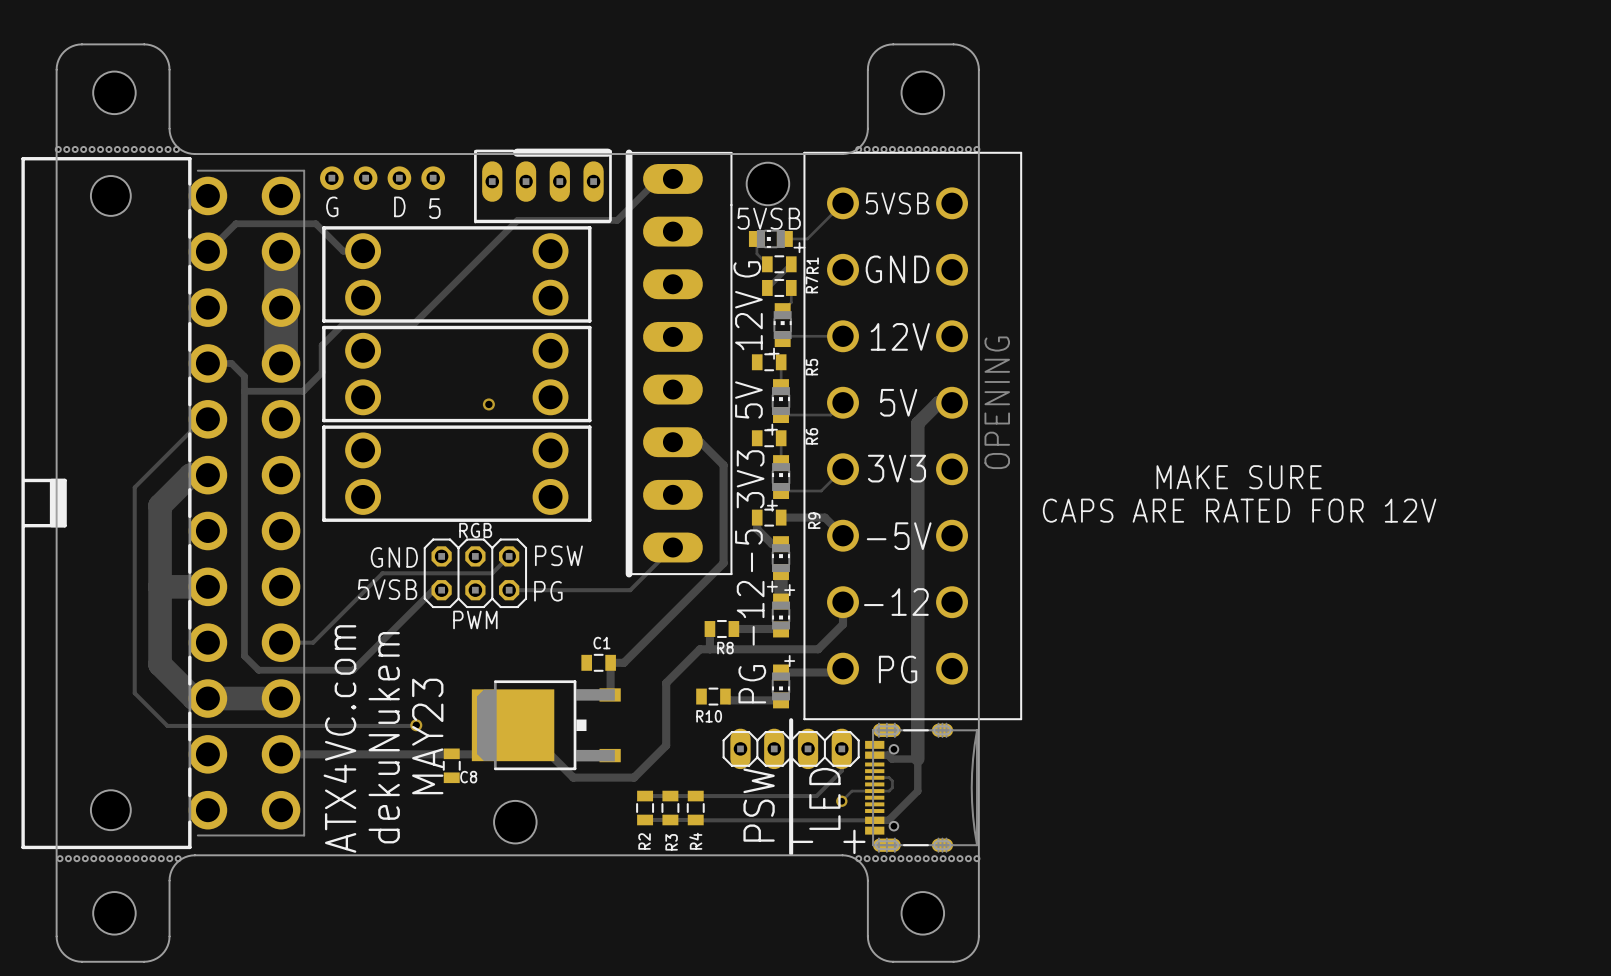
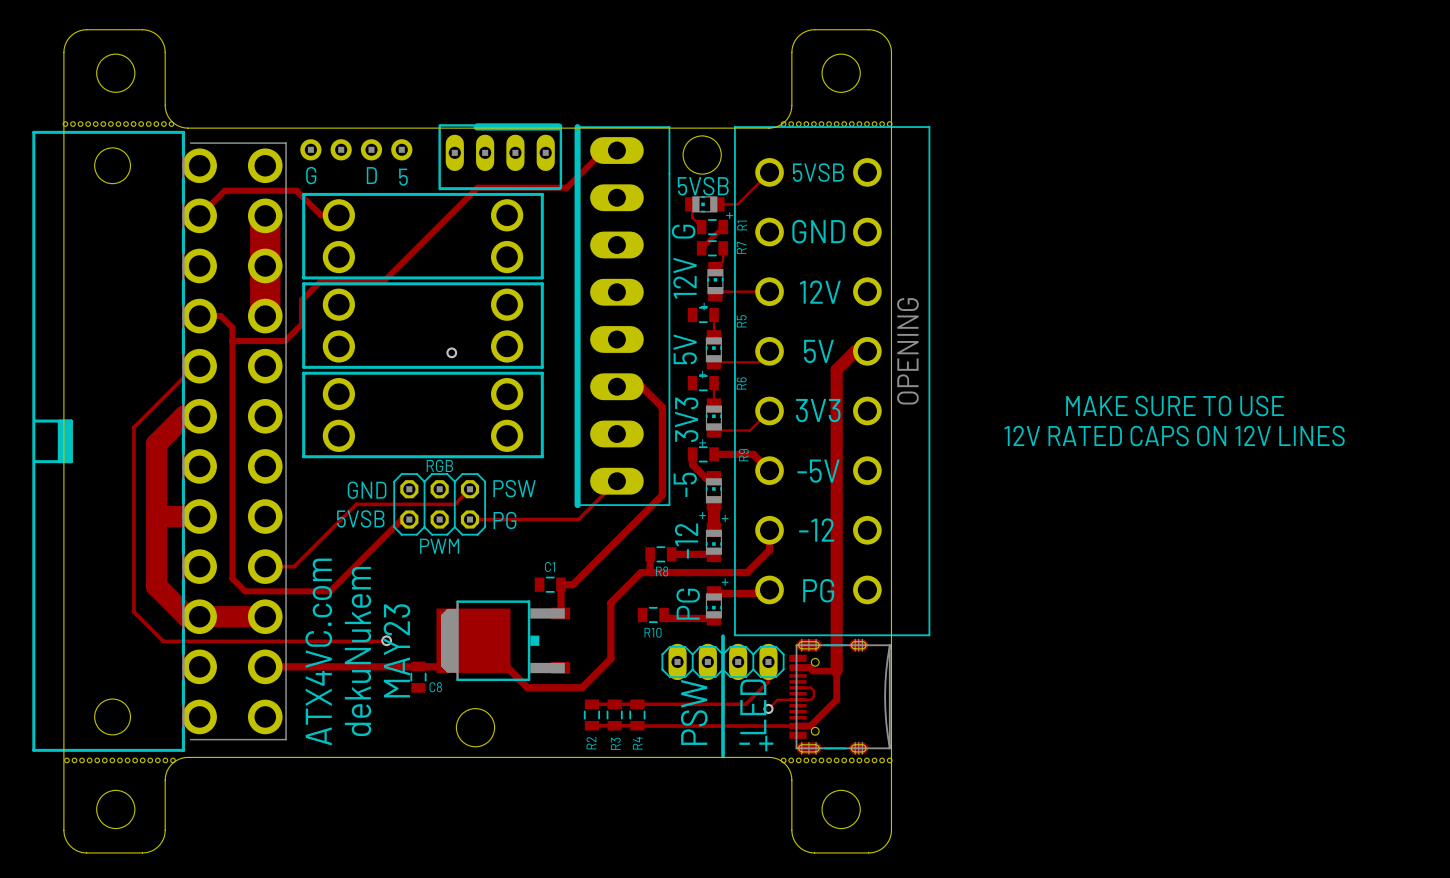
text: MAKE SURE (1239, 477) -> MAKE SURE TO USE (1175, 406)
text: none -> 12V RATED CAPS ON 12V LINES (1174, 436)
text: CAPS ARE RATED FOR 12V (1239, 510) -> none

